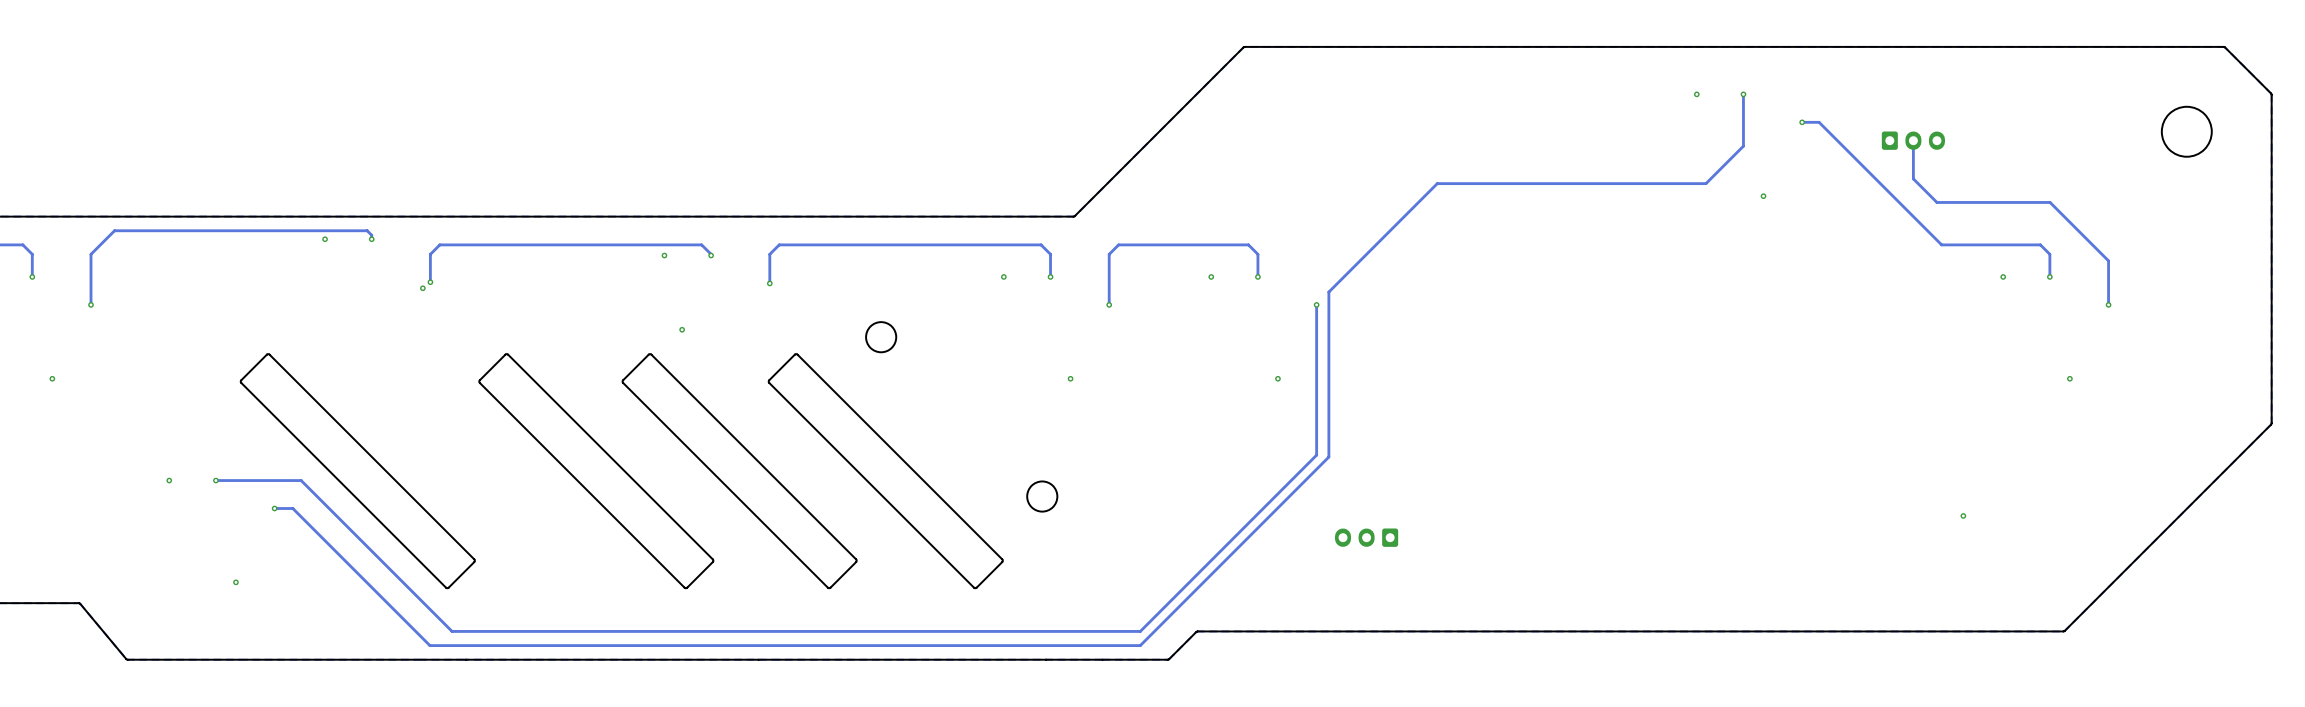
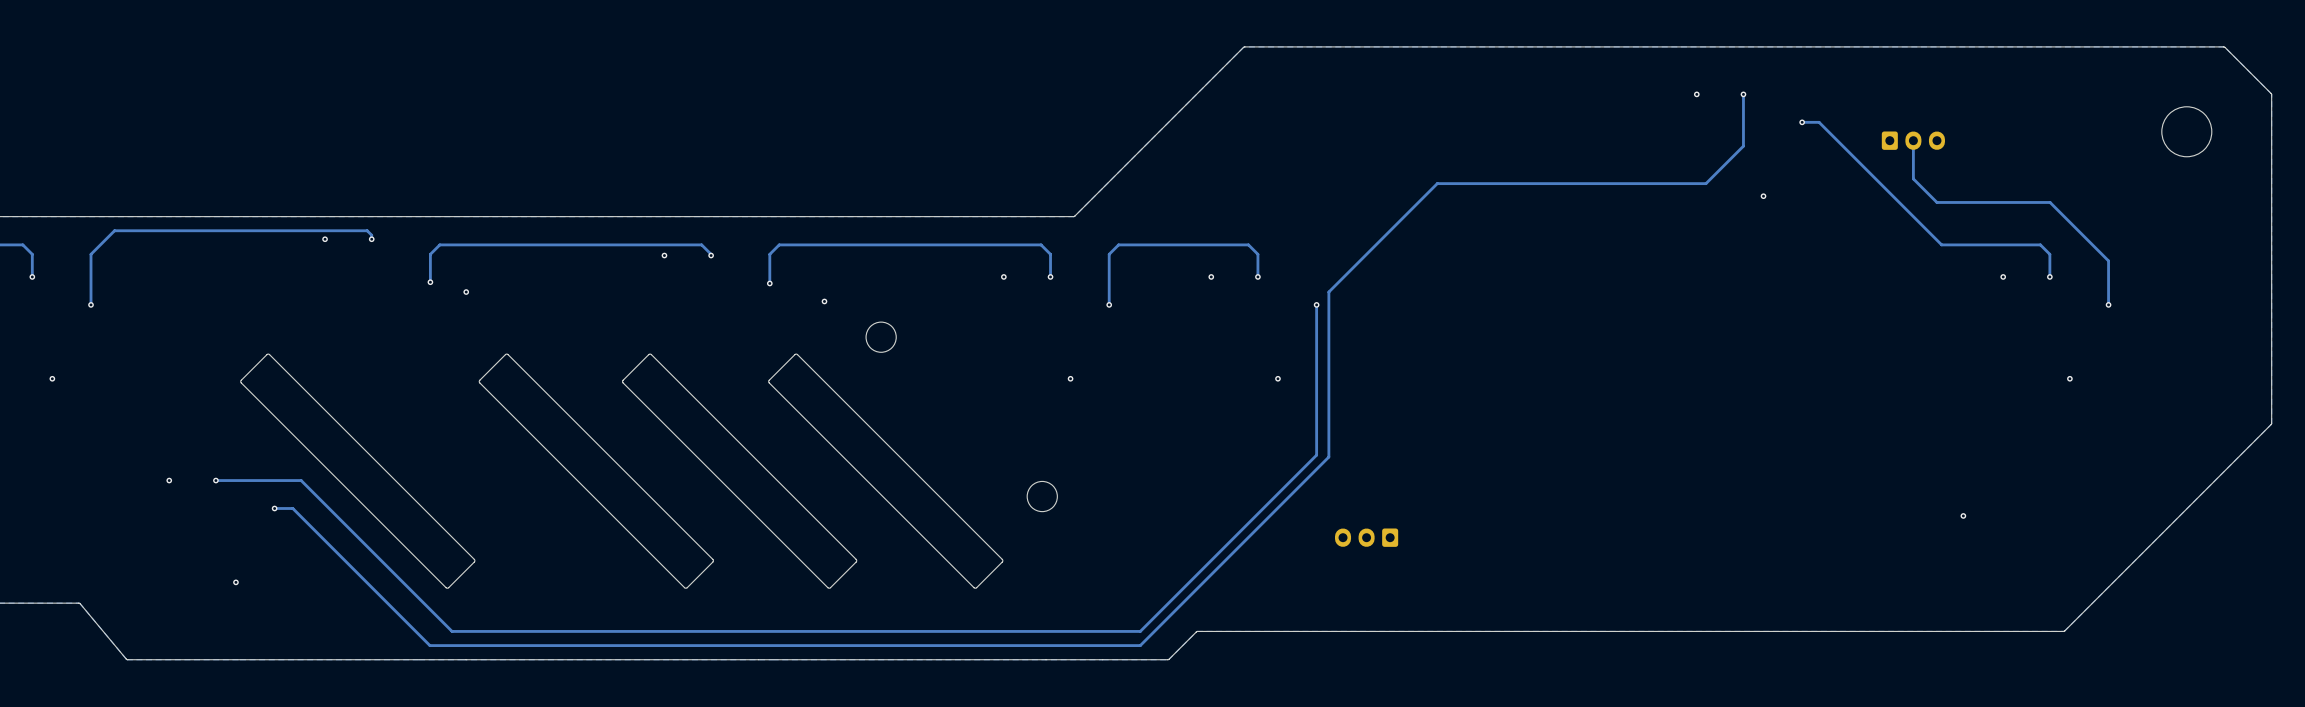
via position: (422, 288) -> (466, 292)
via: none -> (824, 301)
via: (682, 329) -> none

